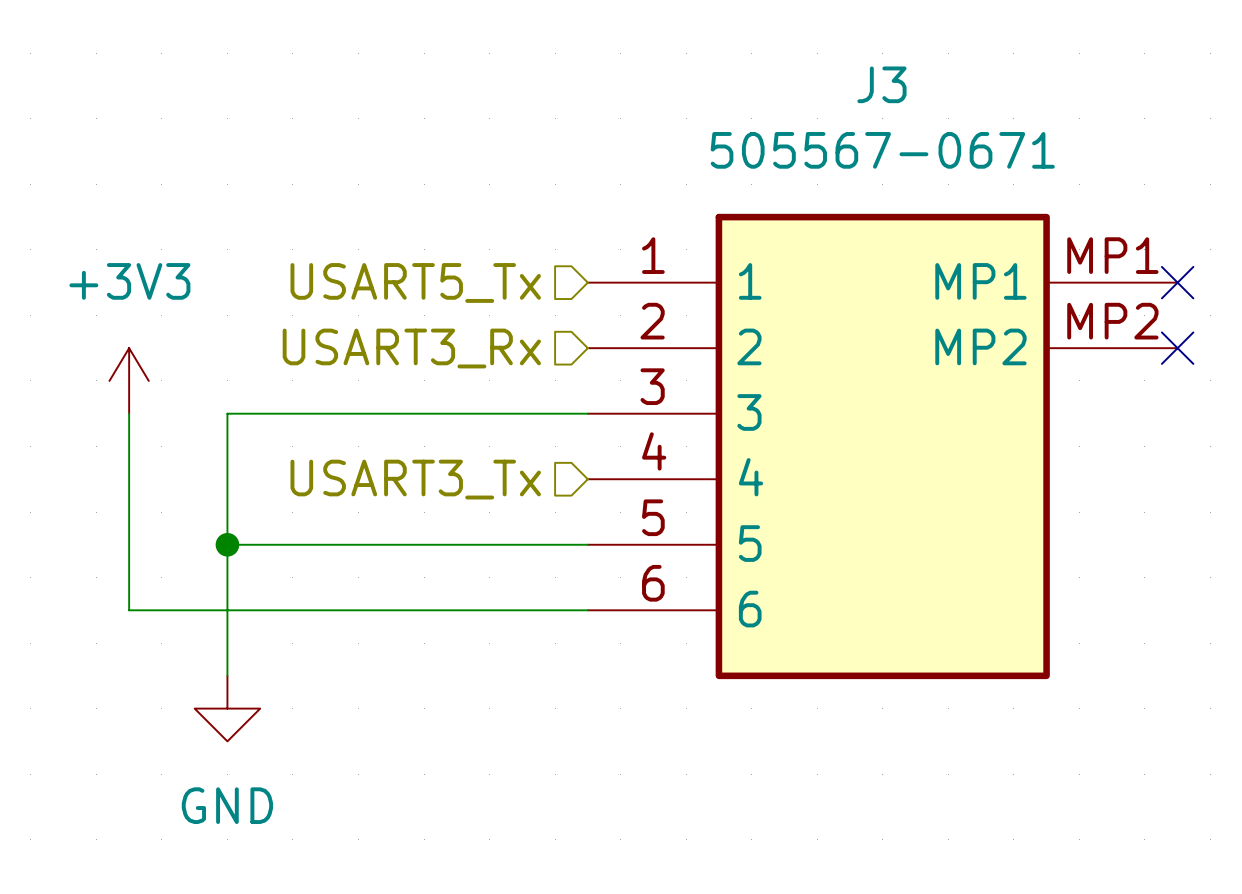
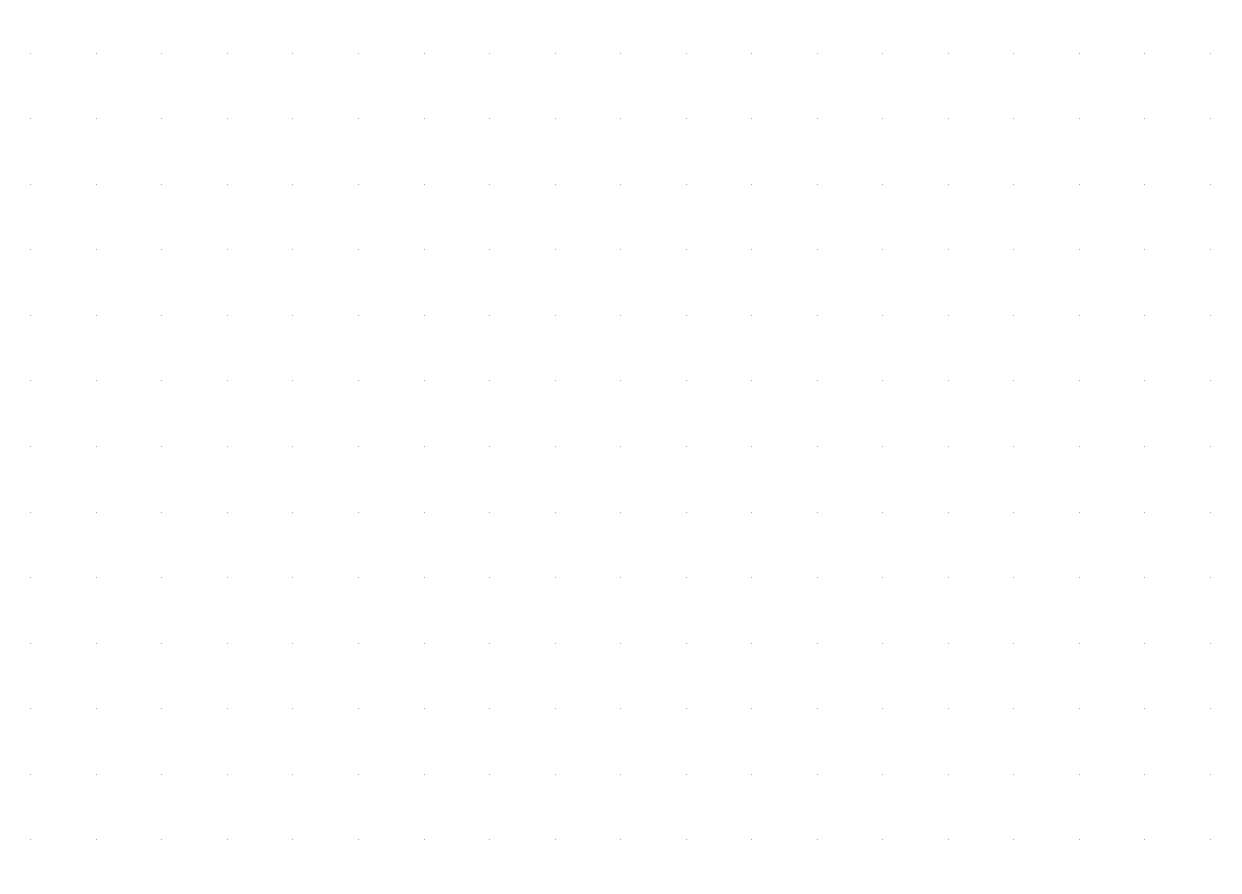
hierarchical label: USART5_Tx (415, 282) -> none
no-connect mark: (1177, 282) -> none
hierarchical label: USART3_Rx (411, 348) -> none
no-connect mark: (1177, 348) -> none
power symbol: +3V3 (129, 380) -> none
wire: (129, 413) (129, 610) (587, 610) -> none
wire: (587, 413) (227, 413) (227, 675) -> none
J3: 505567-0671 (882, 446) -> none
hierarchical label: USART3_Tx (415, 479) -> none
wire: (227, 544) (587, 544) -> none
junction: (227, 544) -> none
power symbol: GND (227, 708) -> none

